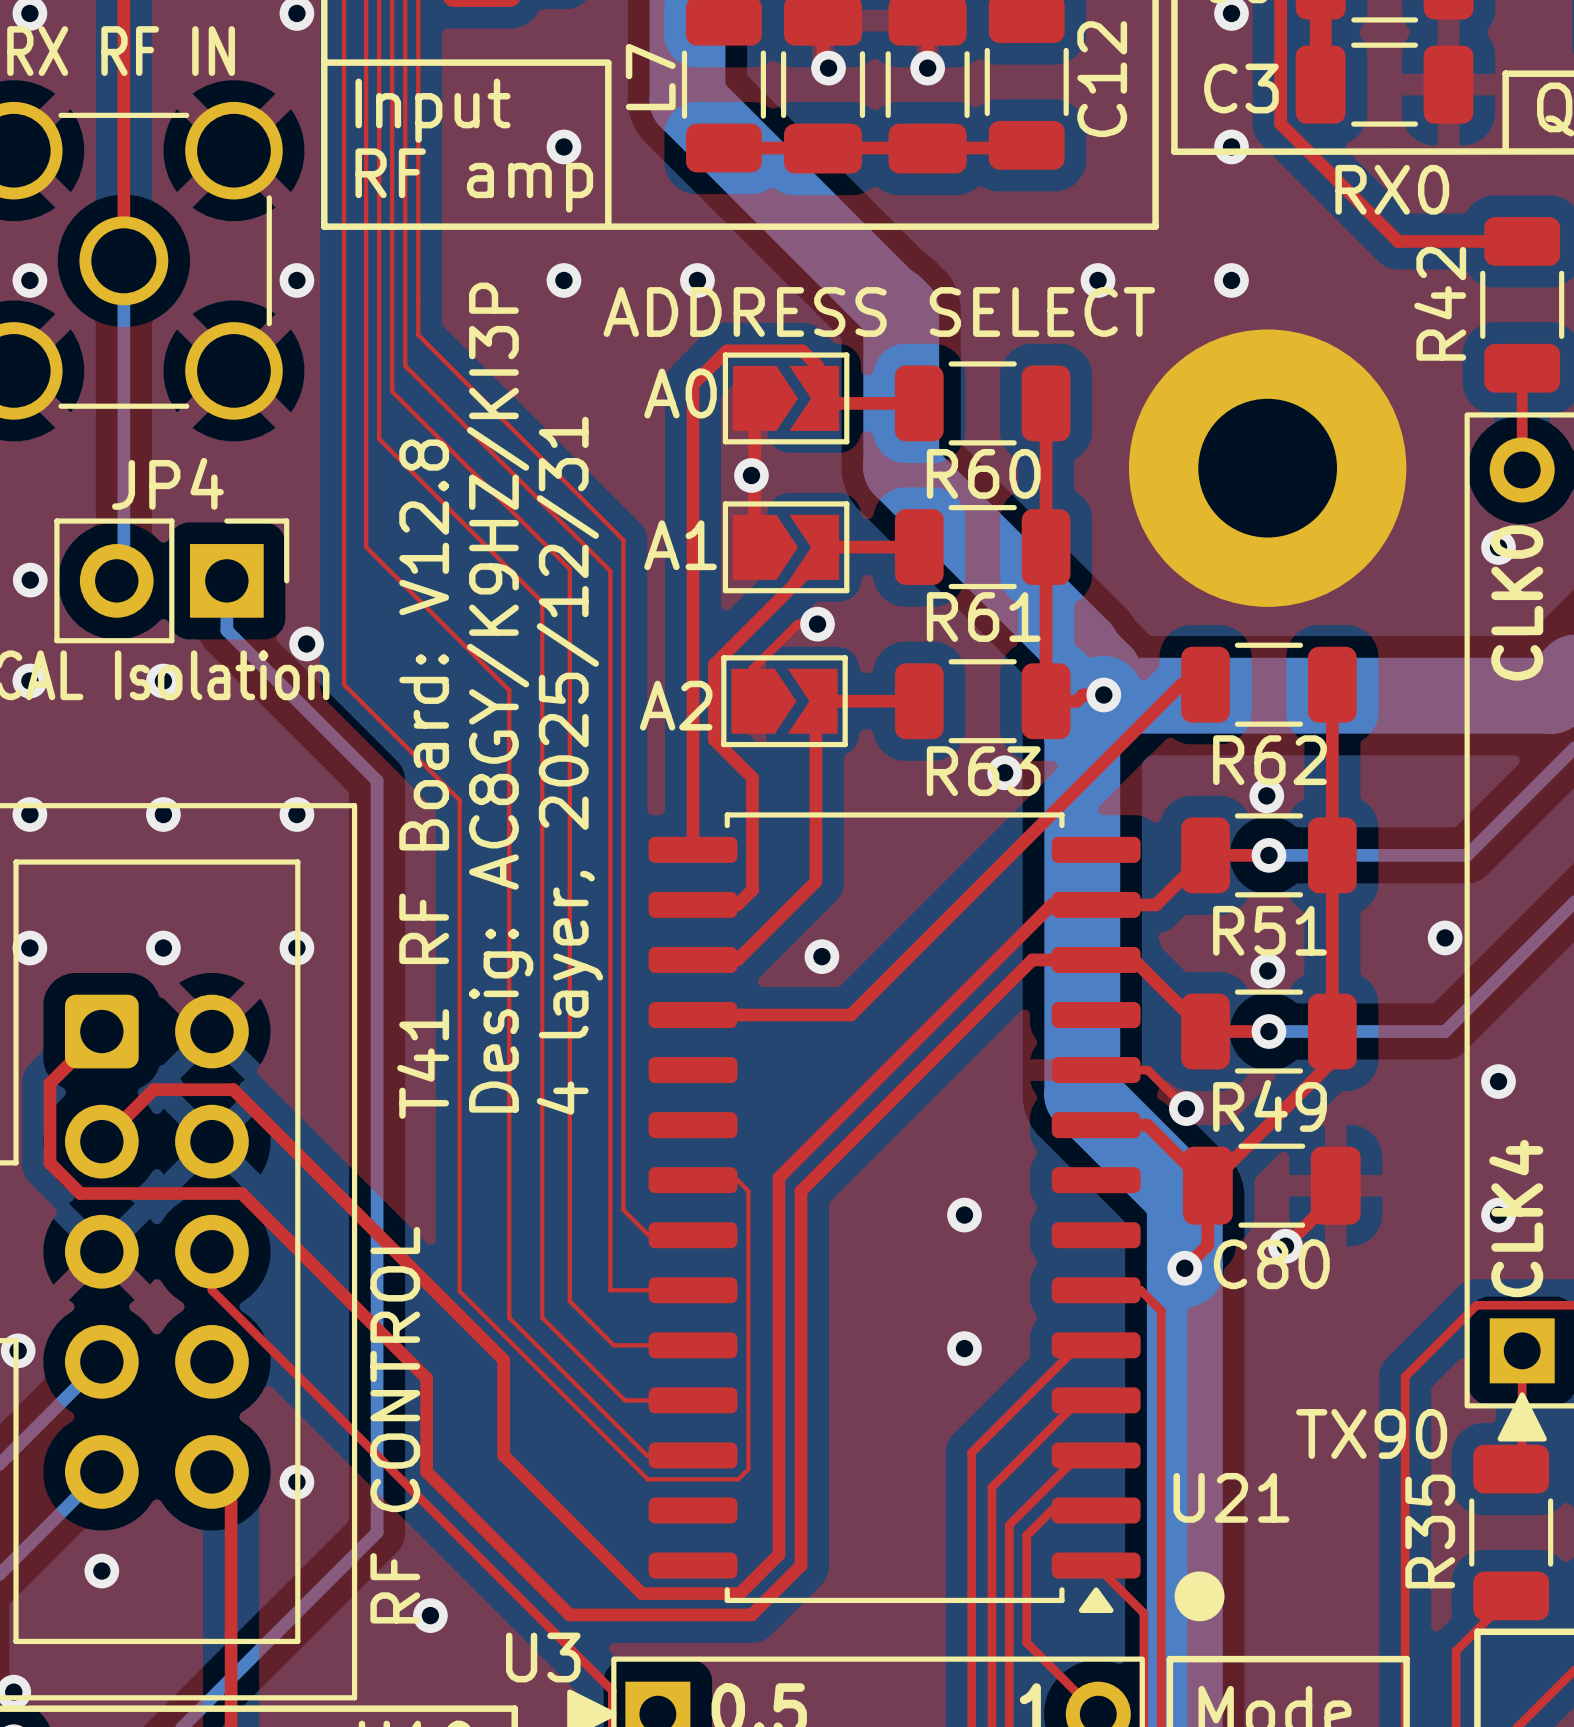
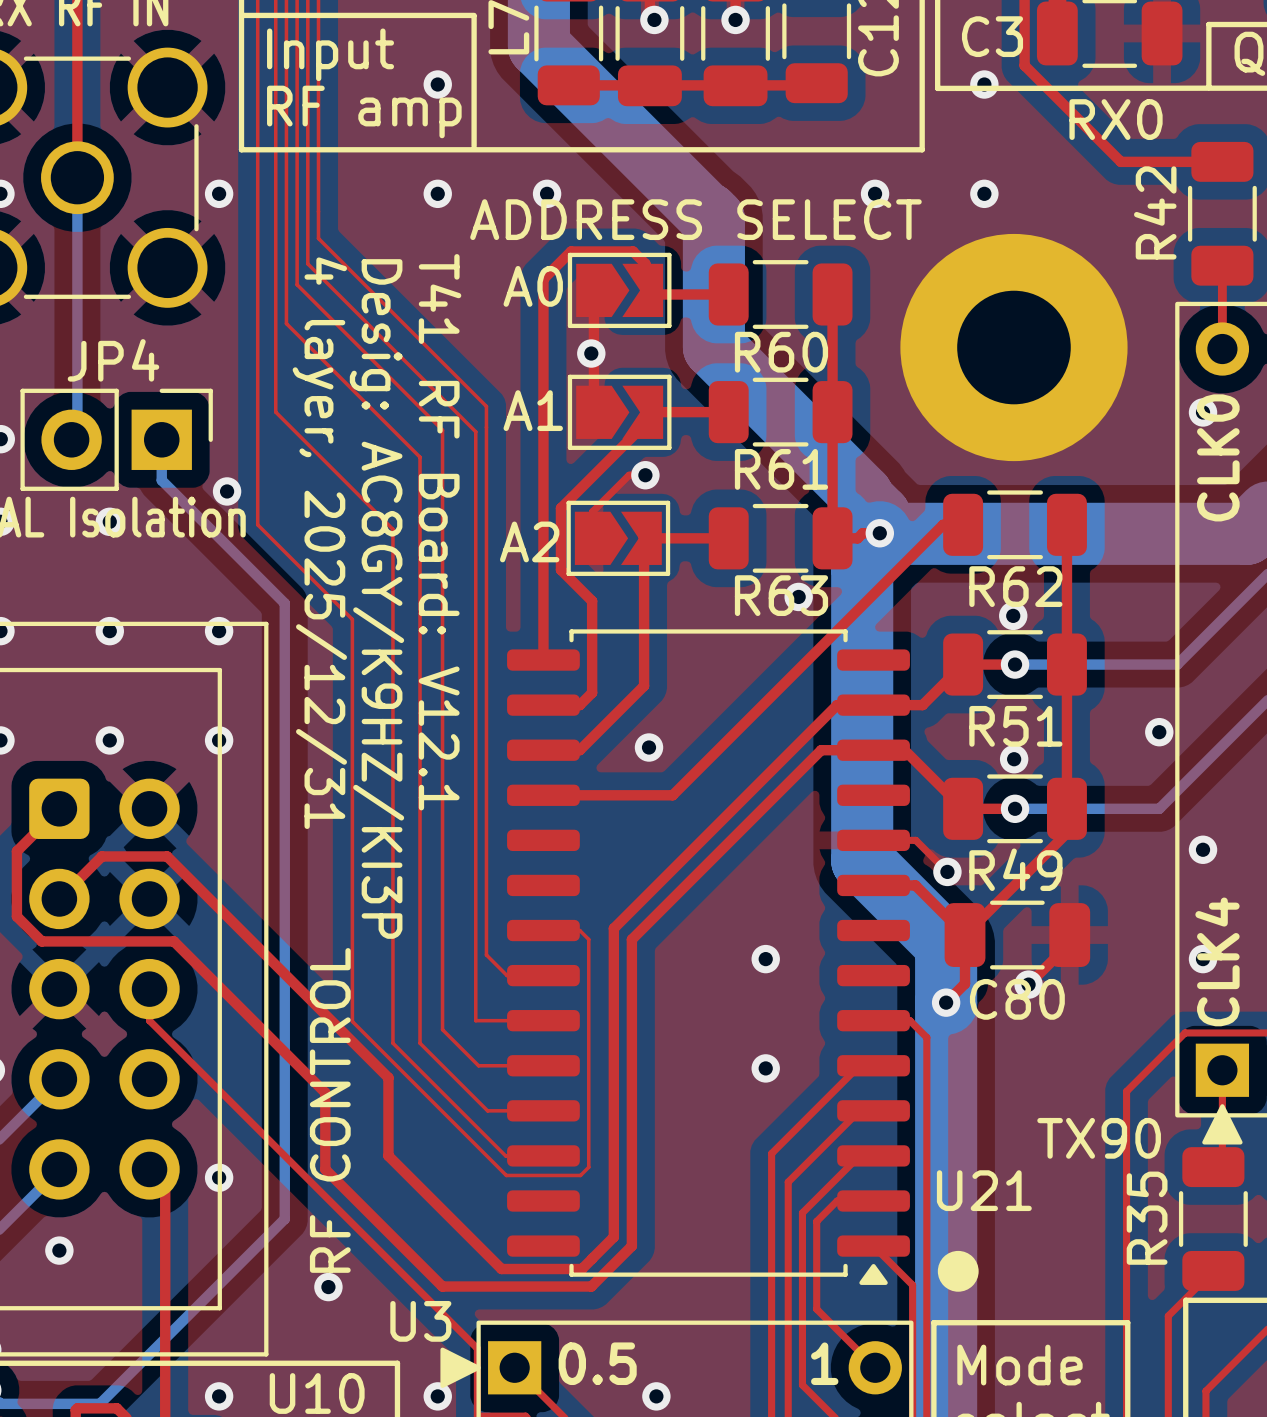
text: none -> T41 RF Board: V12.1 (440, 532)
text rotation: 0° (500, 697) -> 180° (376, 598)
text rotation: 0° (569, 765) -> 180° (319, 543)
text: T41 RF Board: V12.8 (423, 779) -> none
text position: RF CONTROL (395, 1425) -> RF CONTROL (330, 1110)

